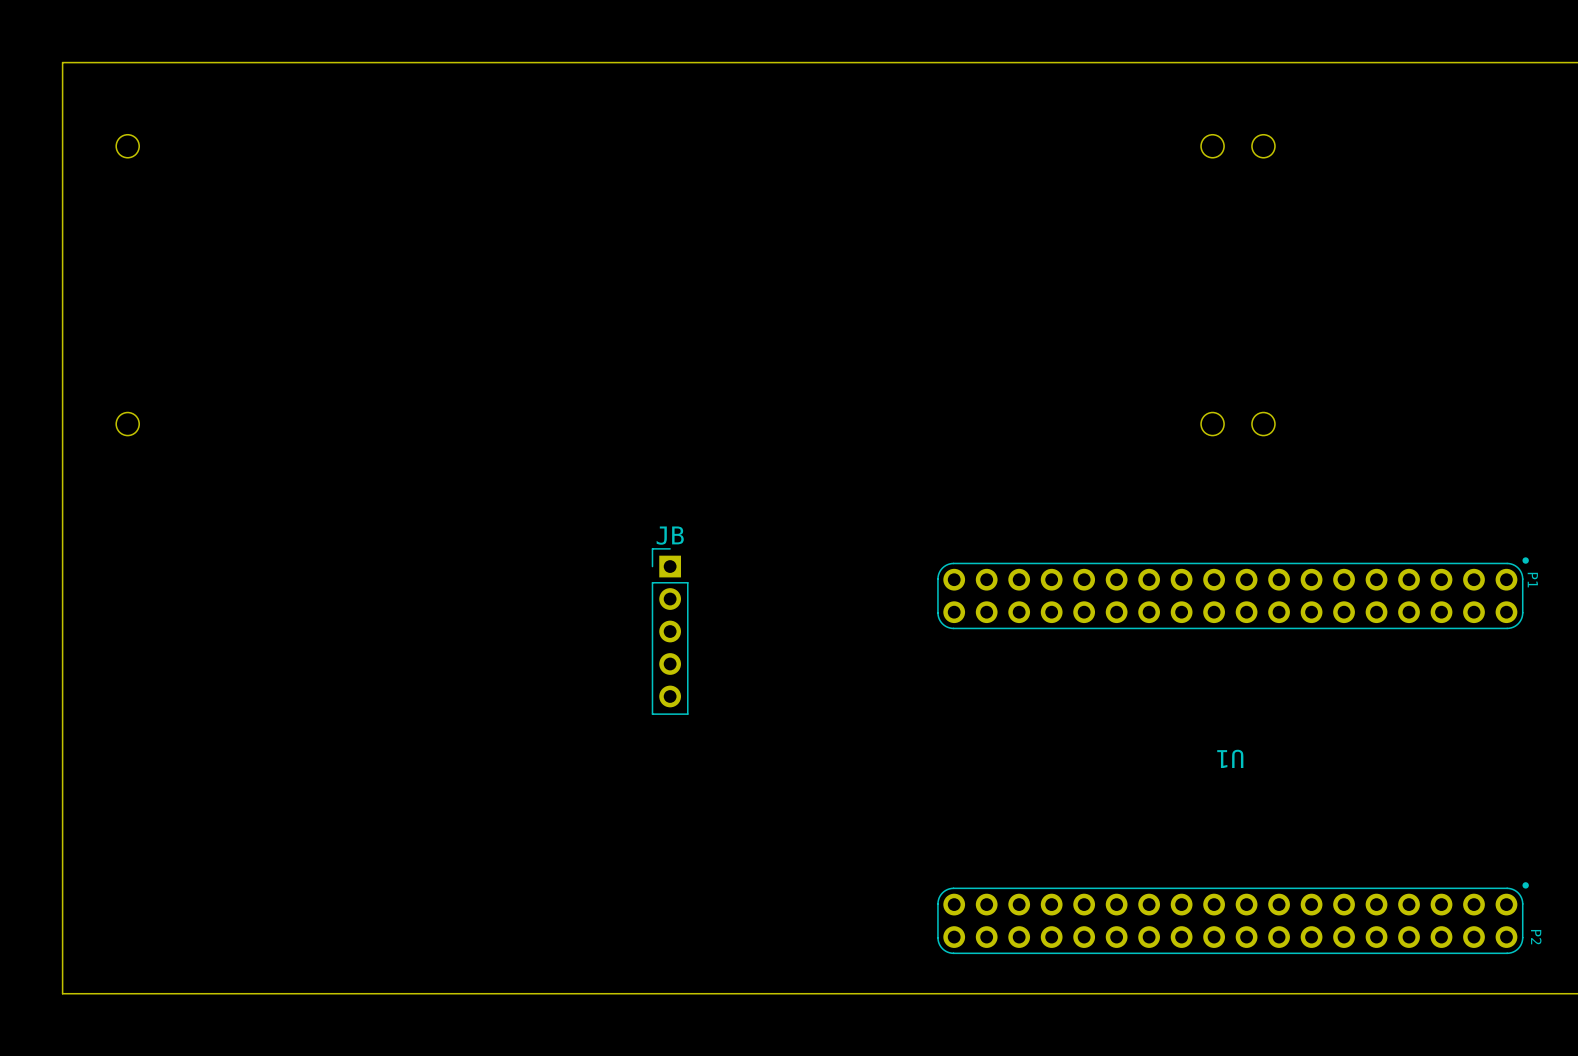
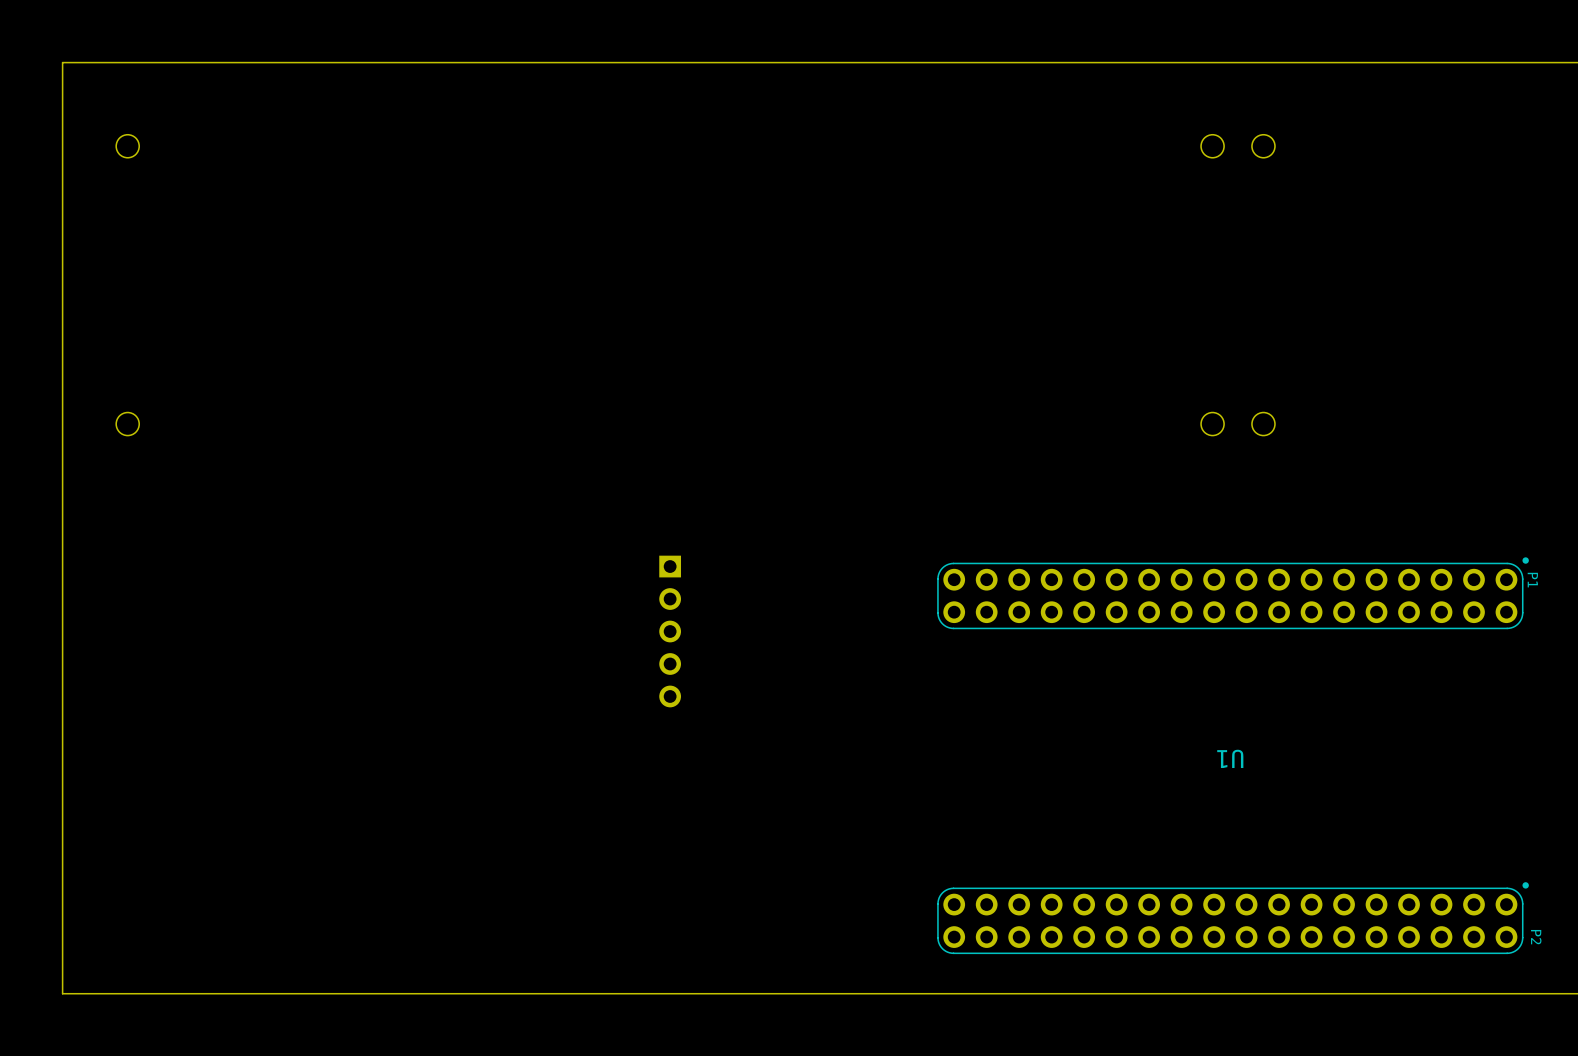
JB: (670, 631) -> none

